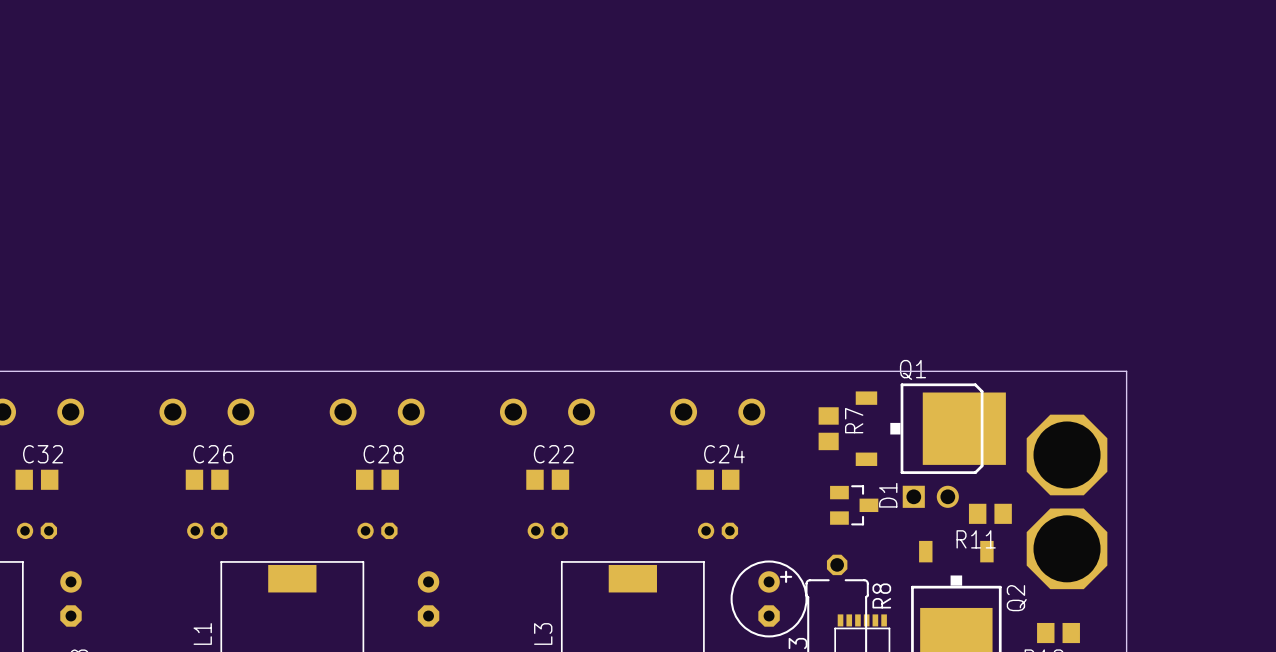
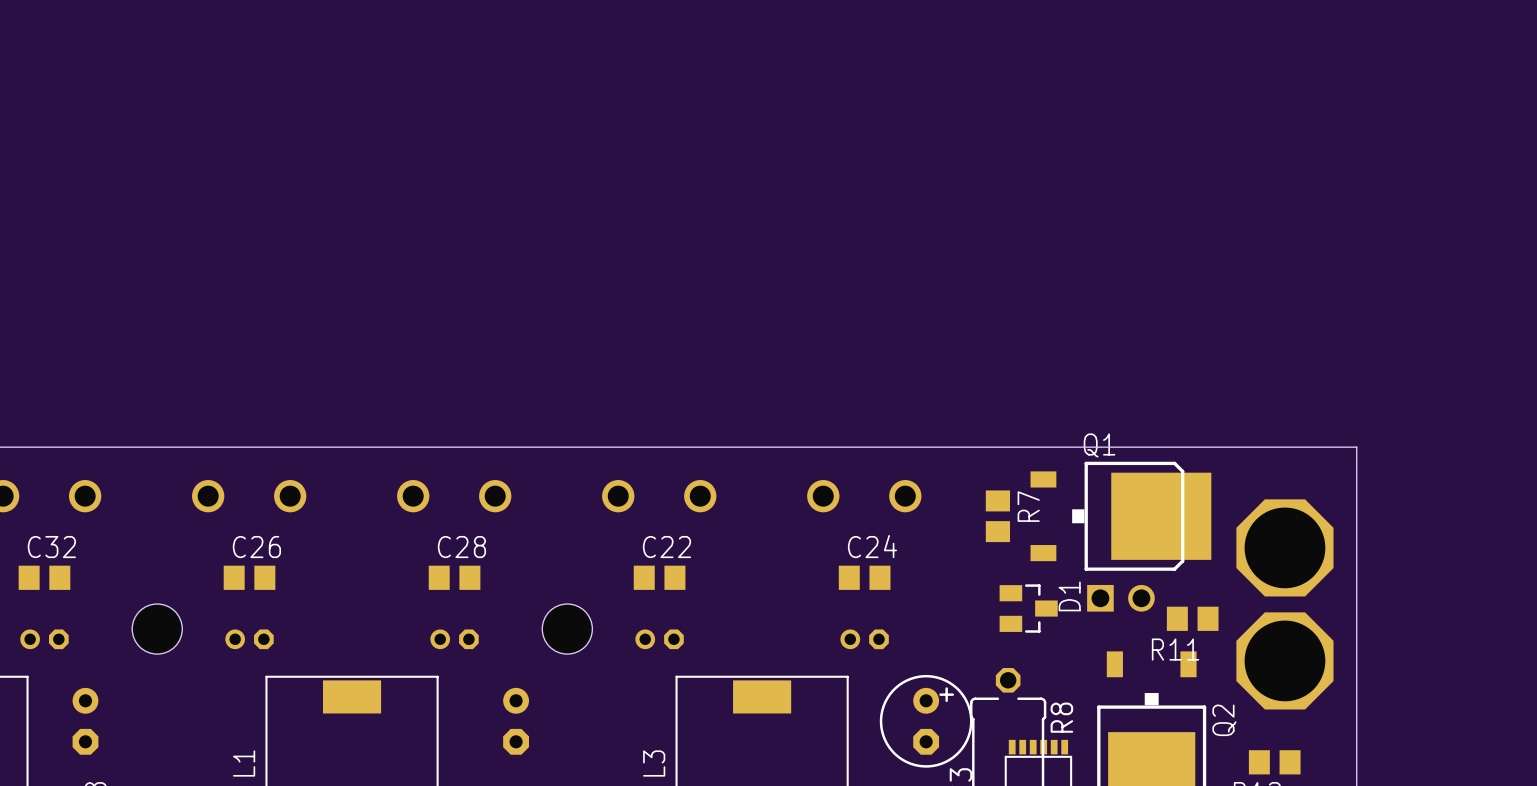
hole: none -> (157, 629)
hole: none -> (567, 629)

